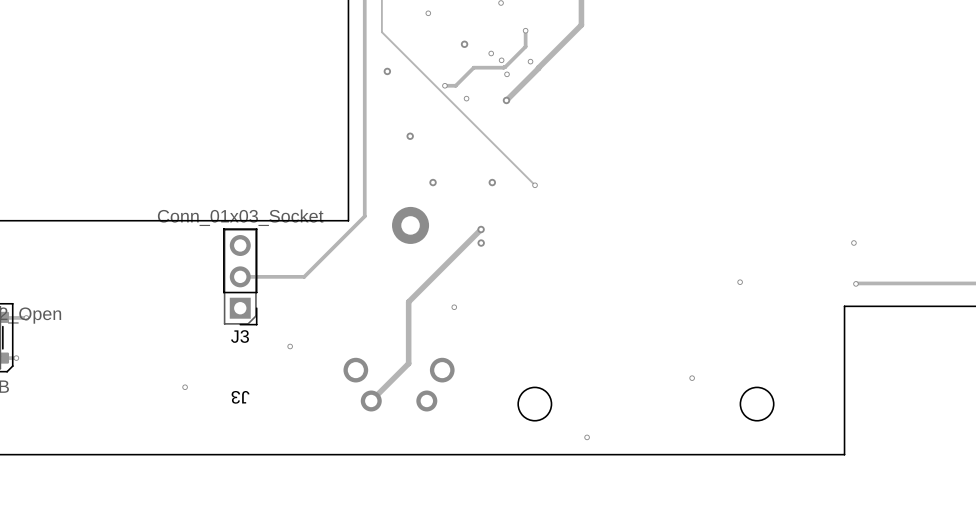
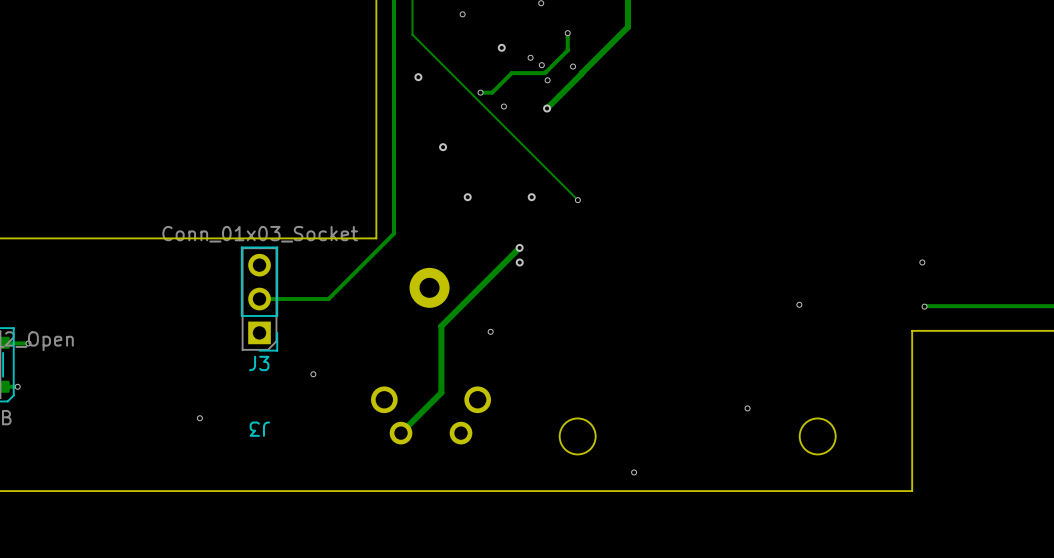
part position: (410, 225) -> (429, 287)

